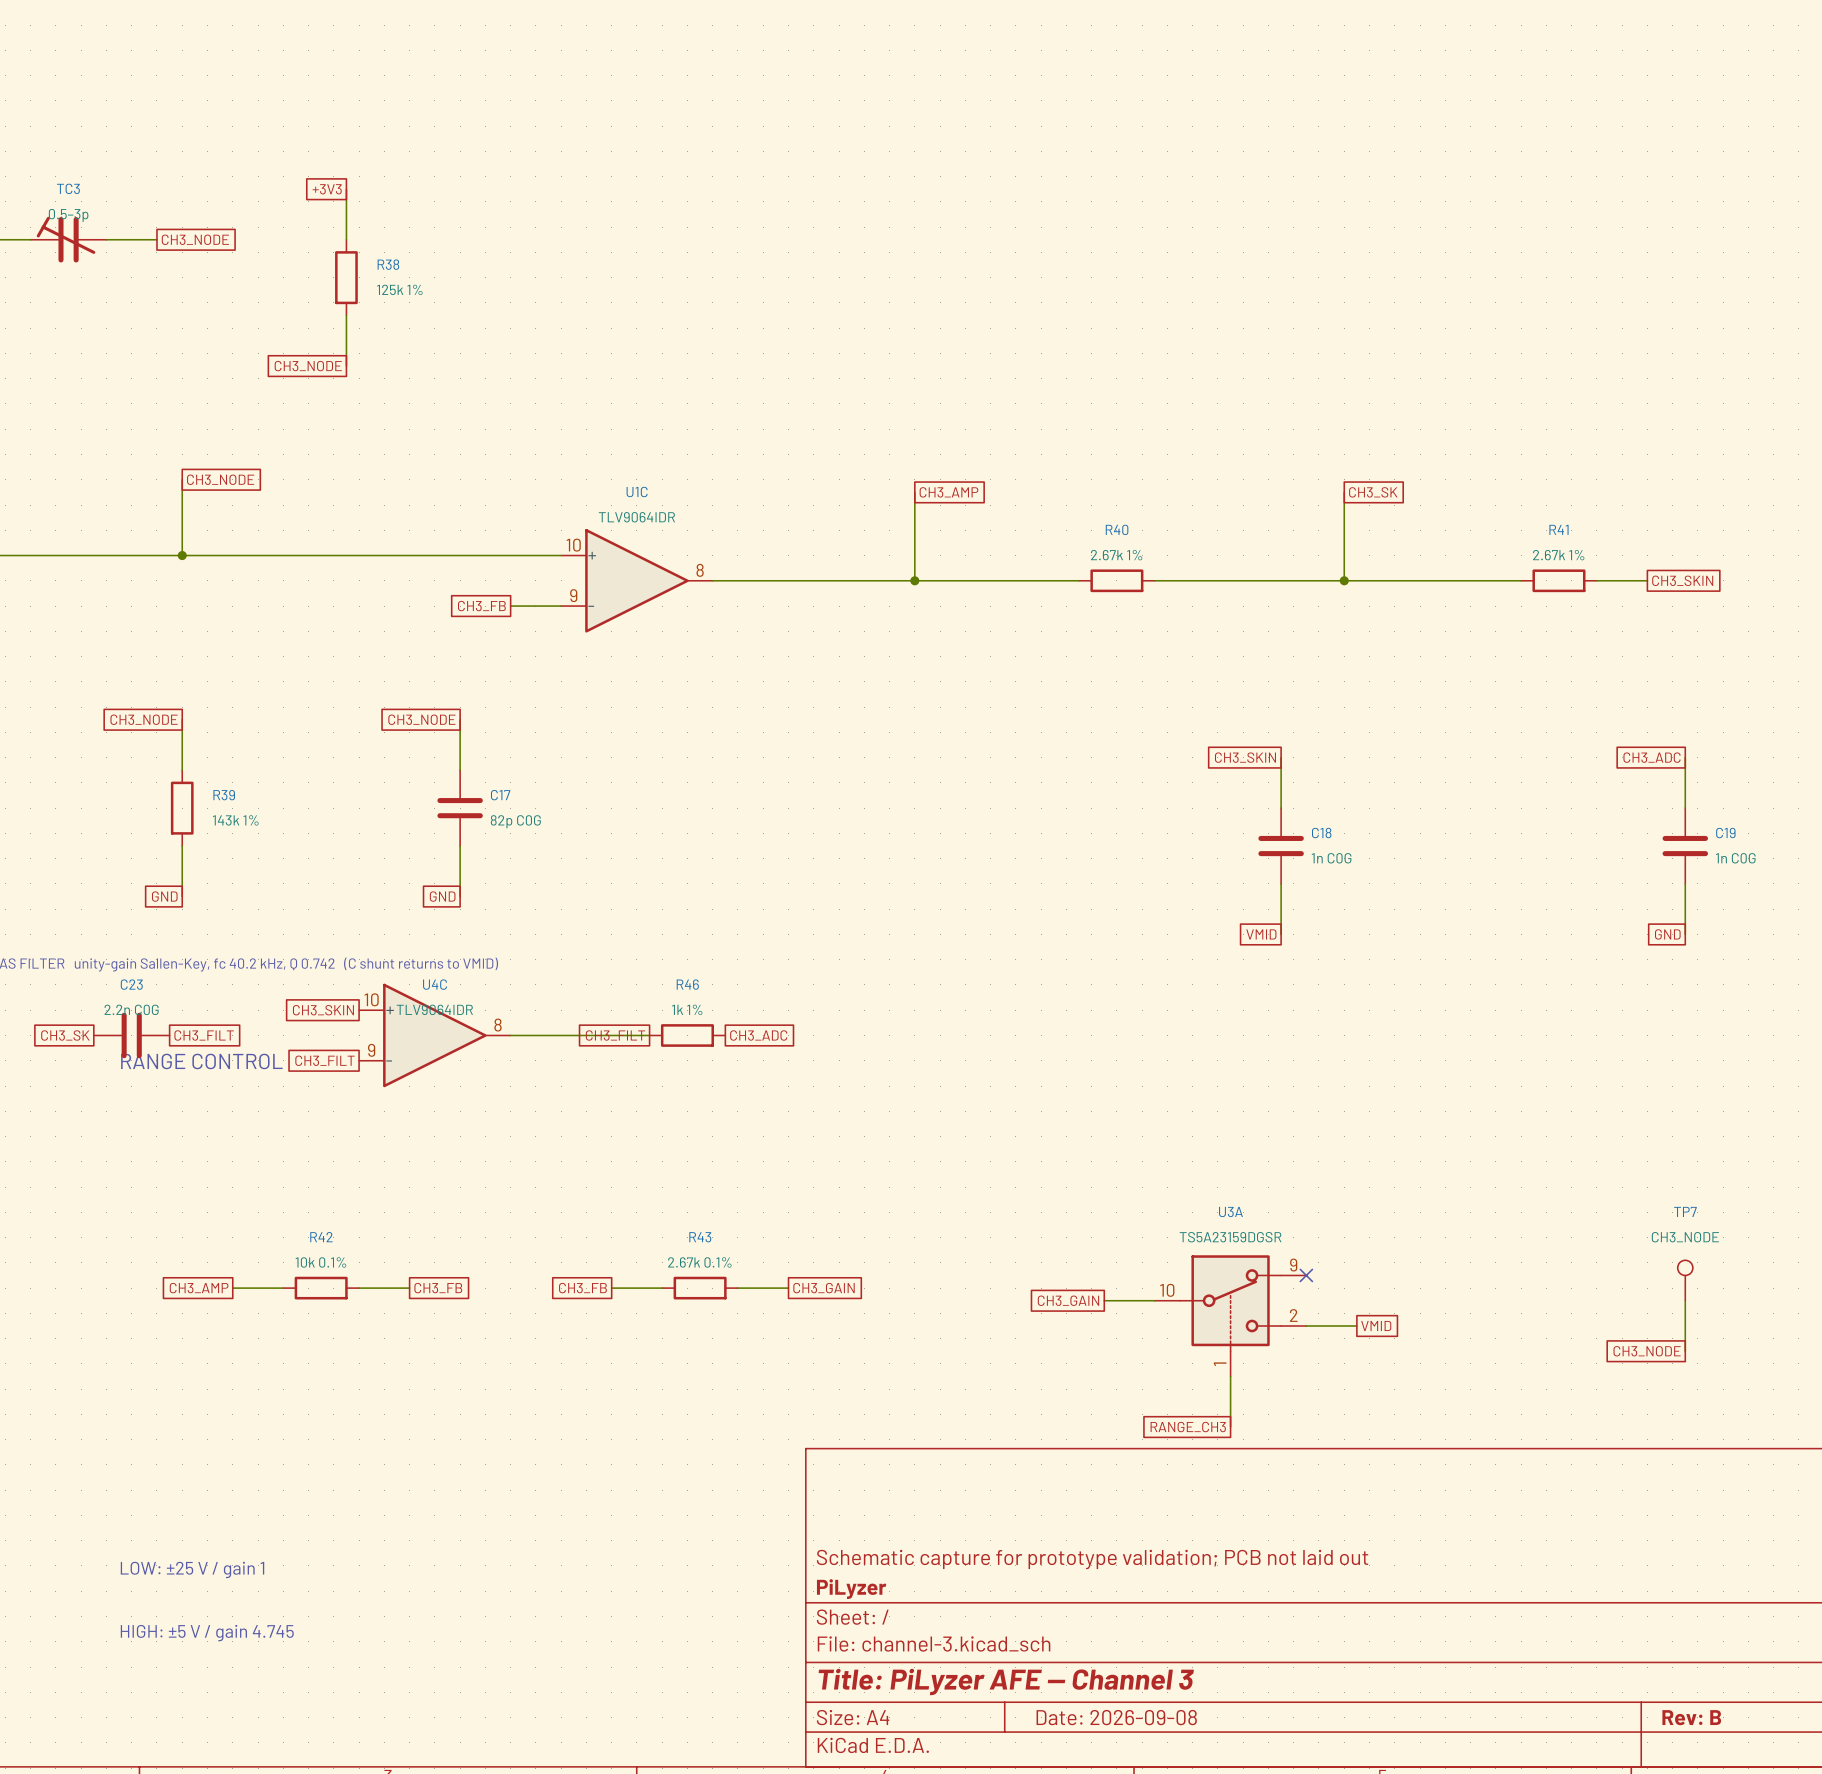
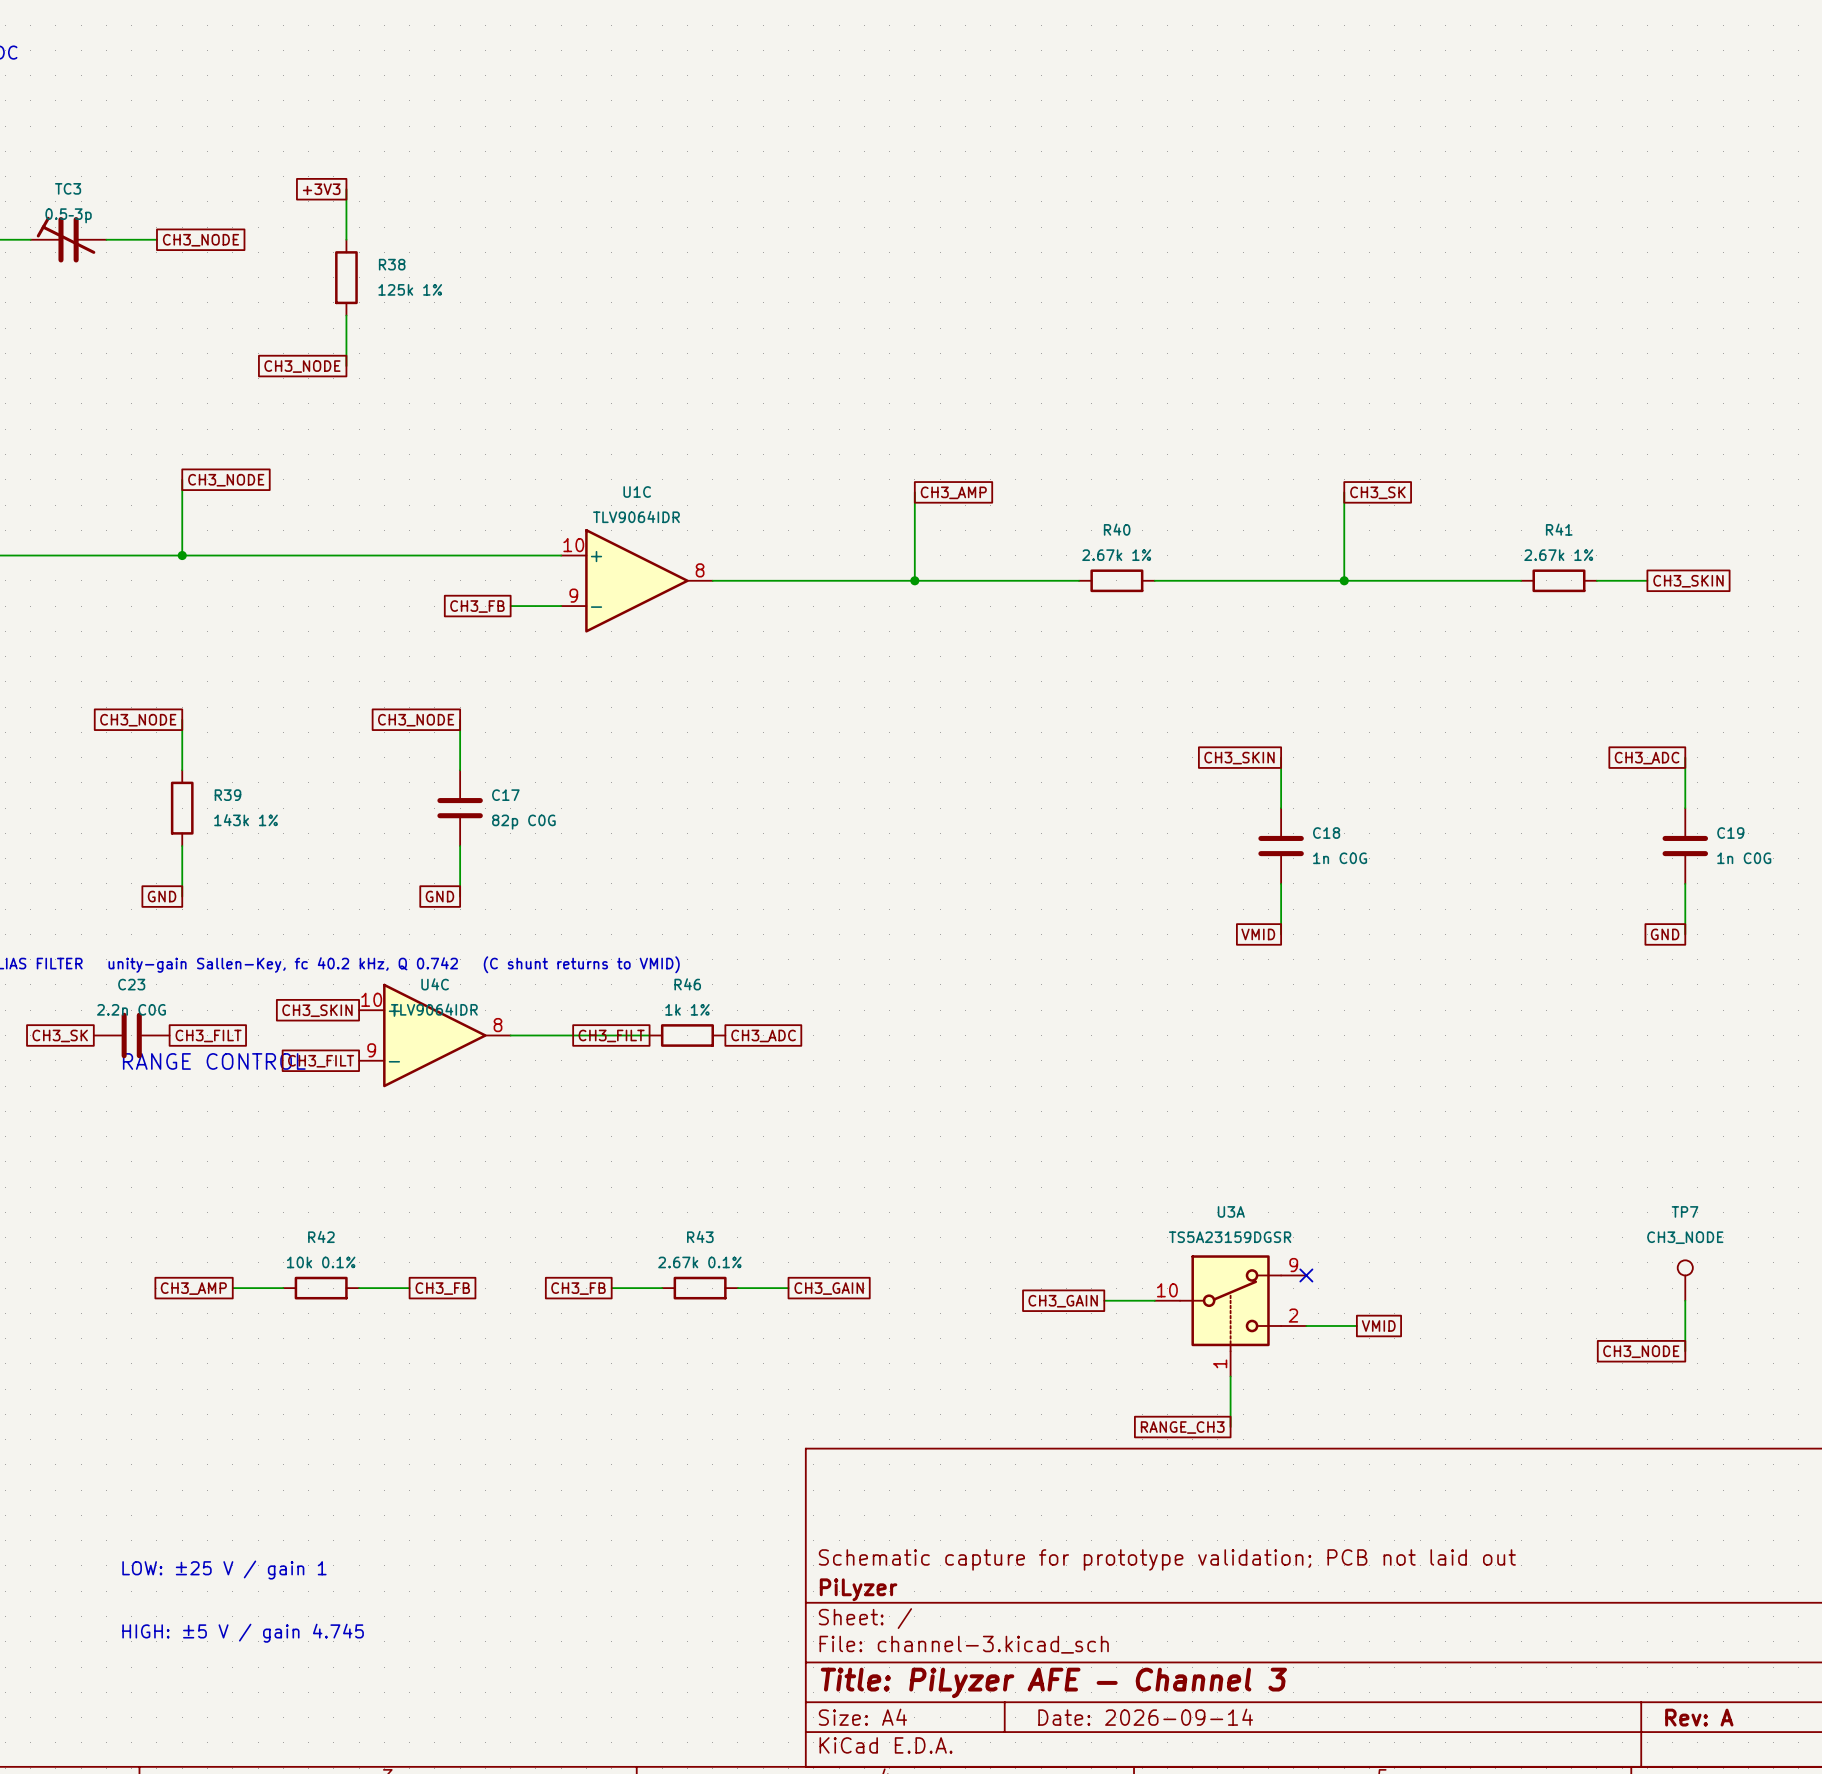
title block: Date: 2026-09-08 (1116, 1717) -> Date: 2026-09-14 (1145, 1717)
title block: Rev: B (1691, 1717) -> Rev: A (1699, 1717)

